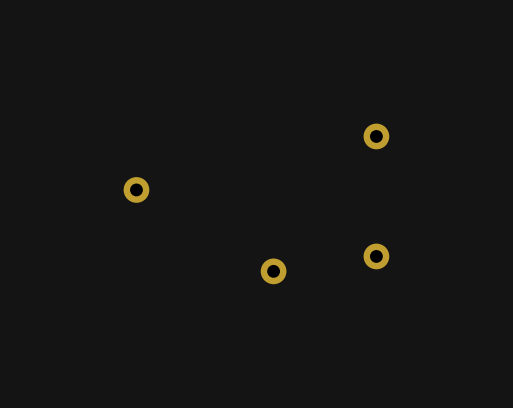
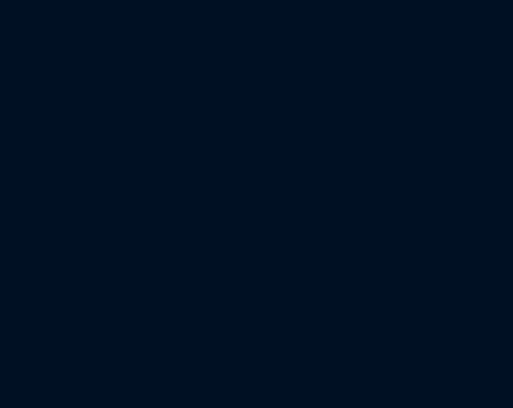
via: (376, 136) -> none
via: (136, 189) -> none
via: (376, 256) -> none
via: (273, 271) -> none

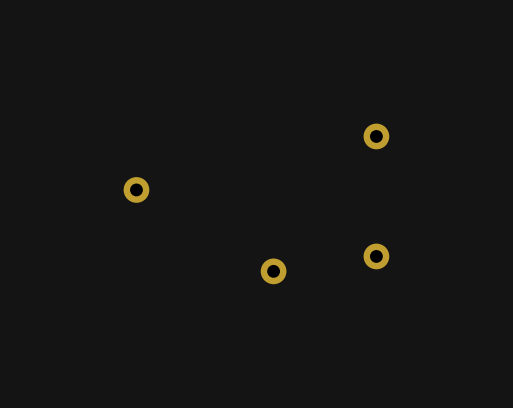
via: none -> (376, 136)
via: none -> (136, 189)
via: none -> (376, 256)
via: none -> (273, 271)

